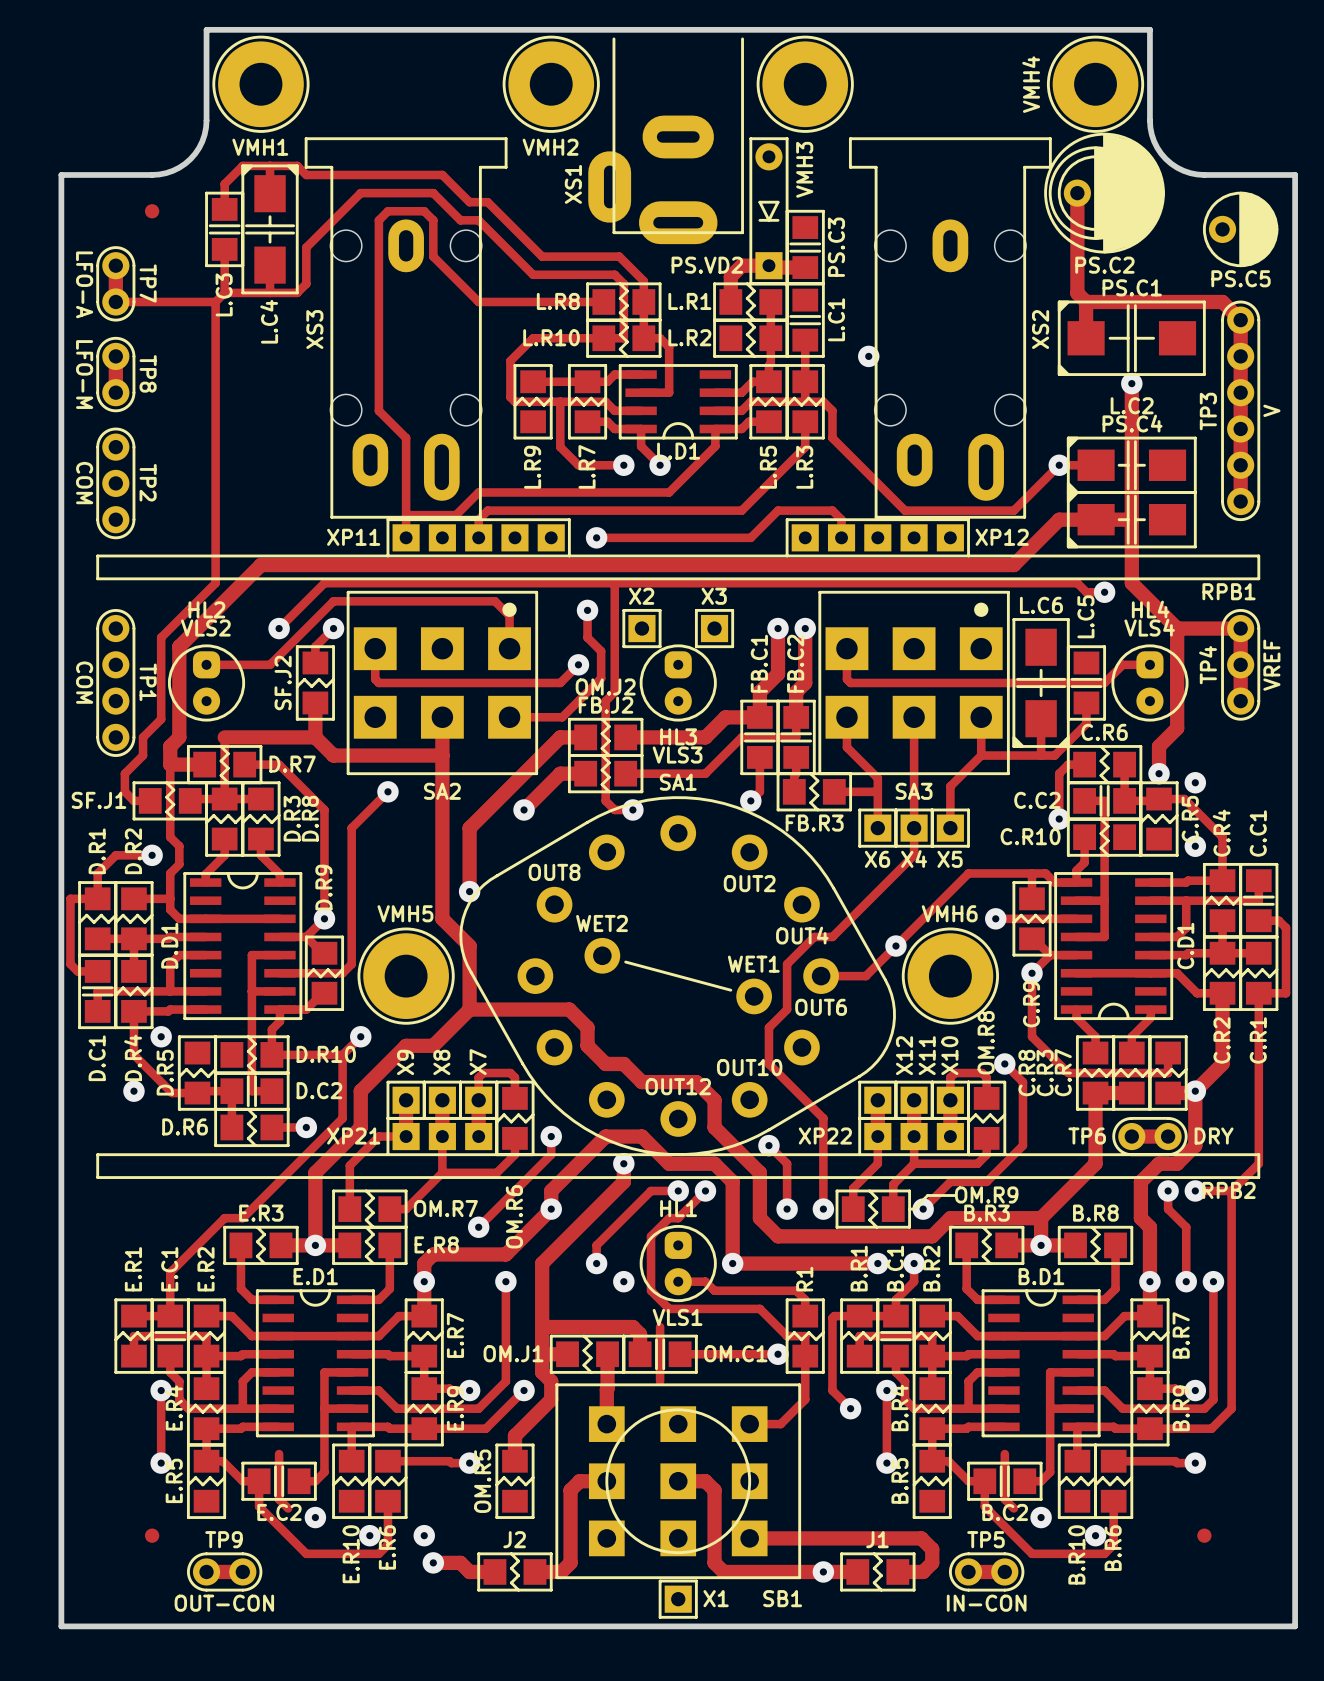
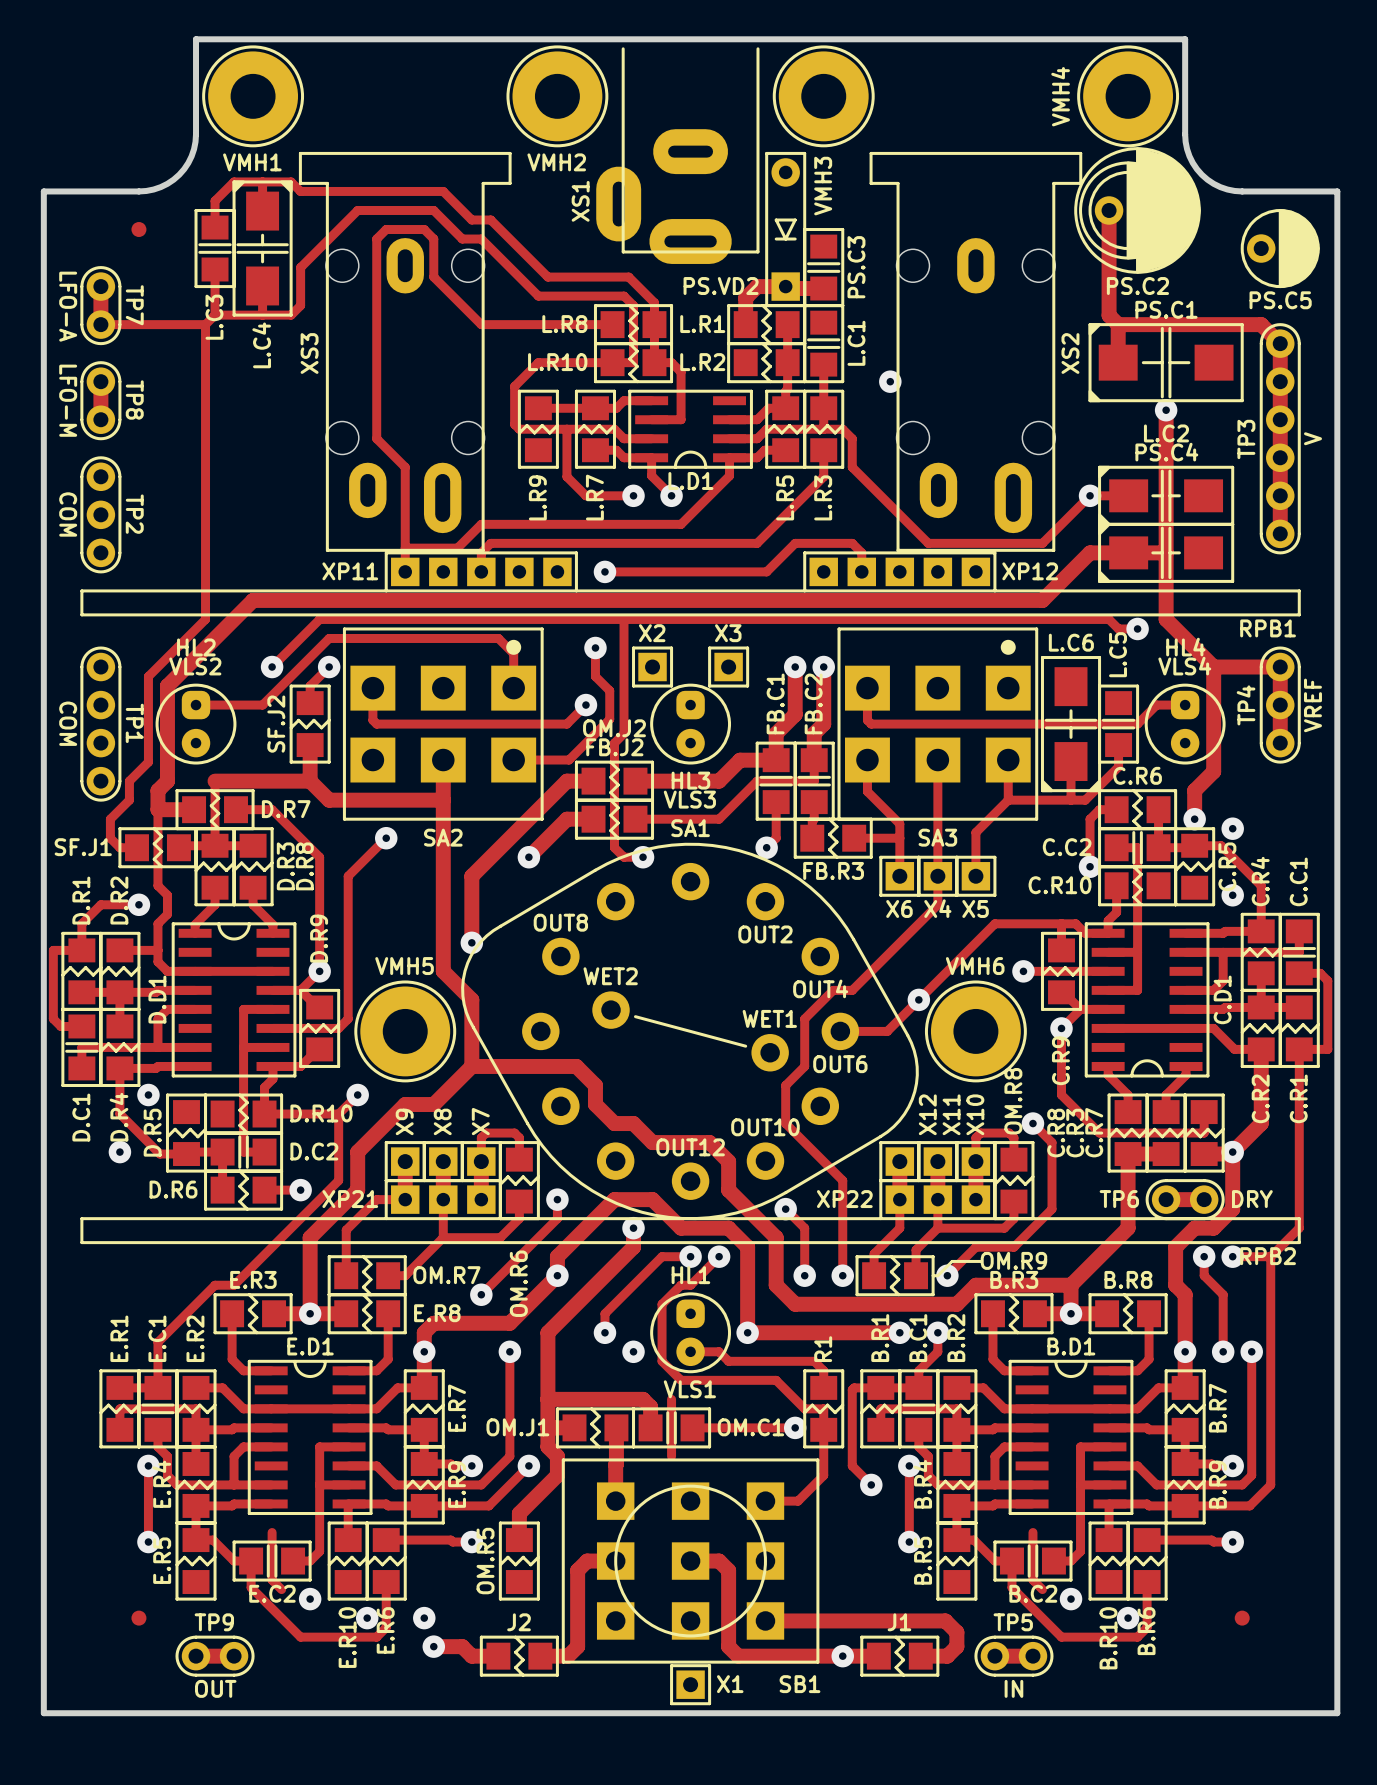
TP9 value: OUT-CON (224, 1603) -> OUT (215, 1688)
TP5 value: IN-CON (986, 1603) -> IN (1013, 1688)

